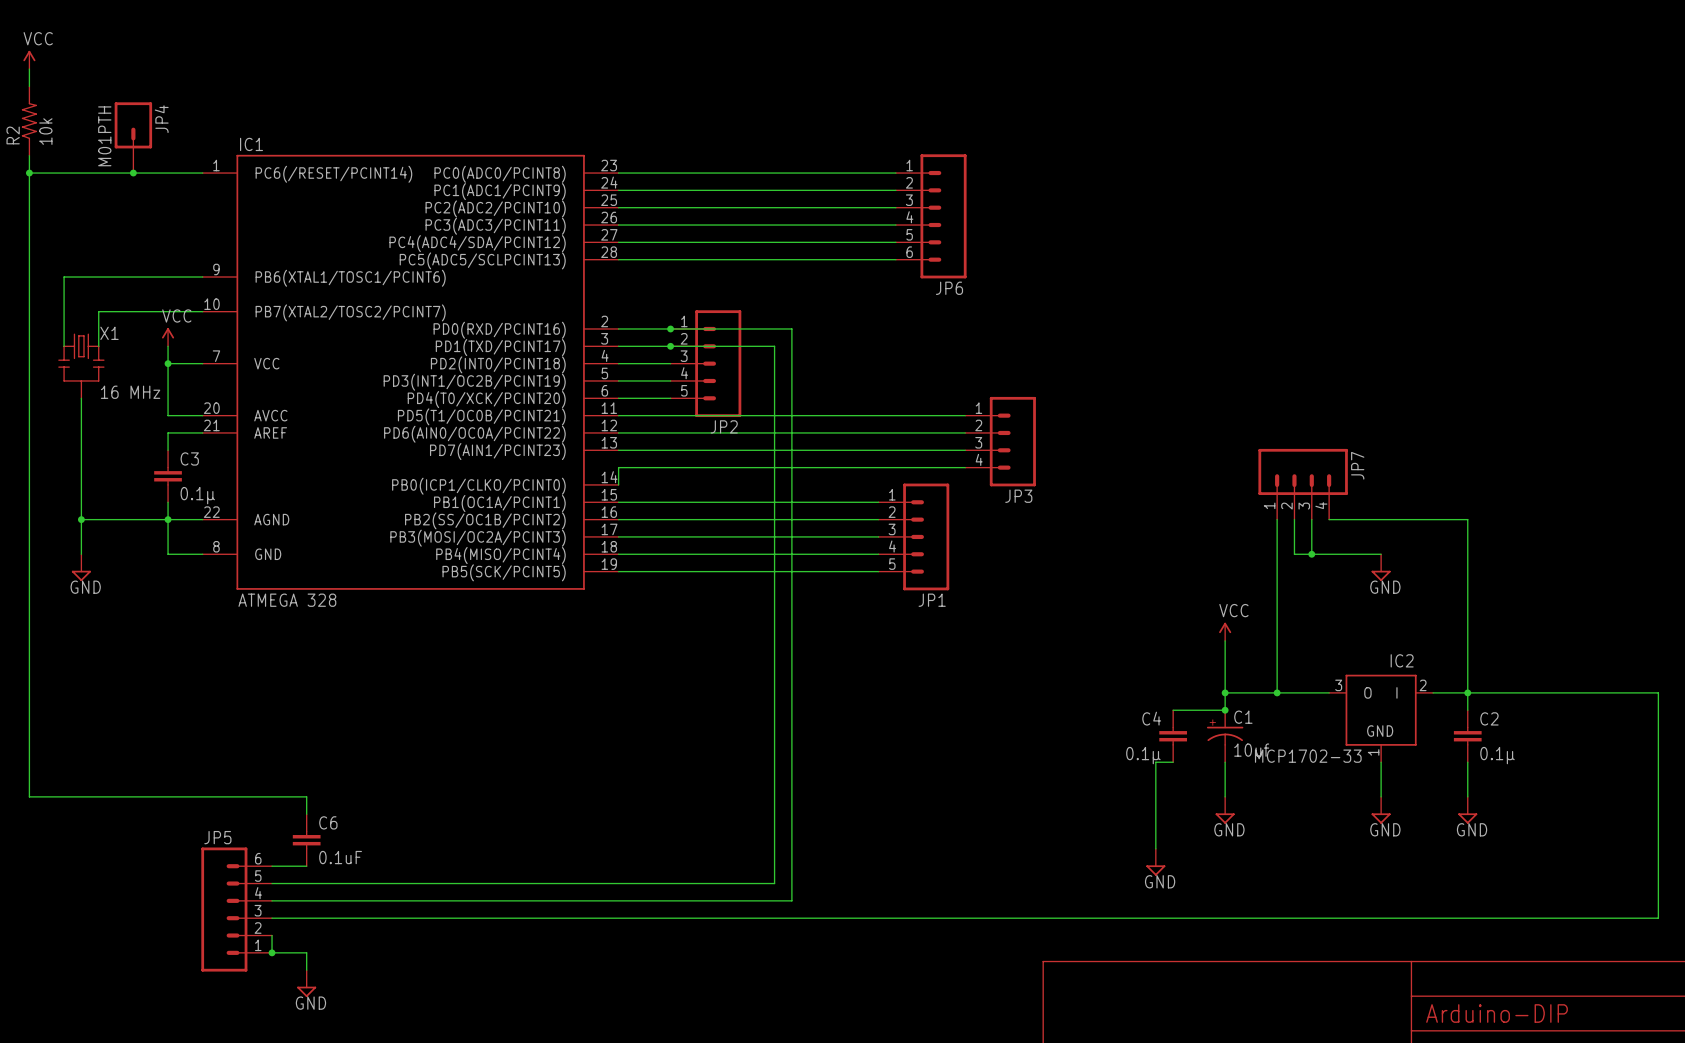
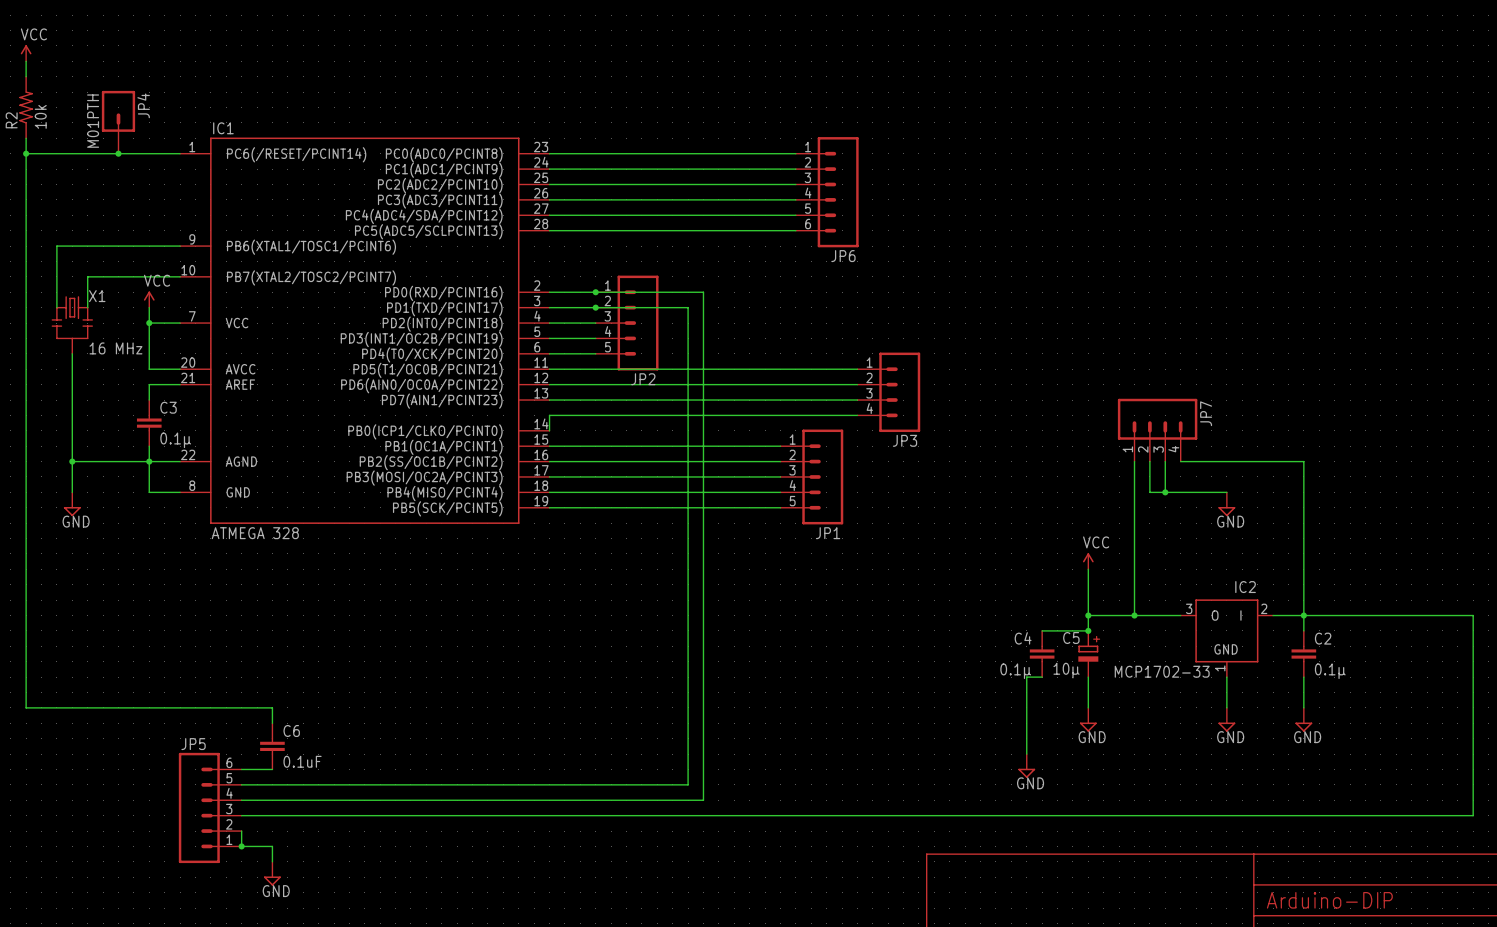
C1: 10uf (1225, 736) -> none
C5: none -> 10µ (1088, 654)

